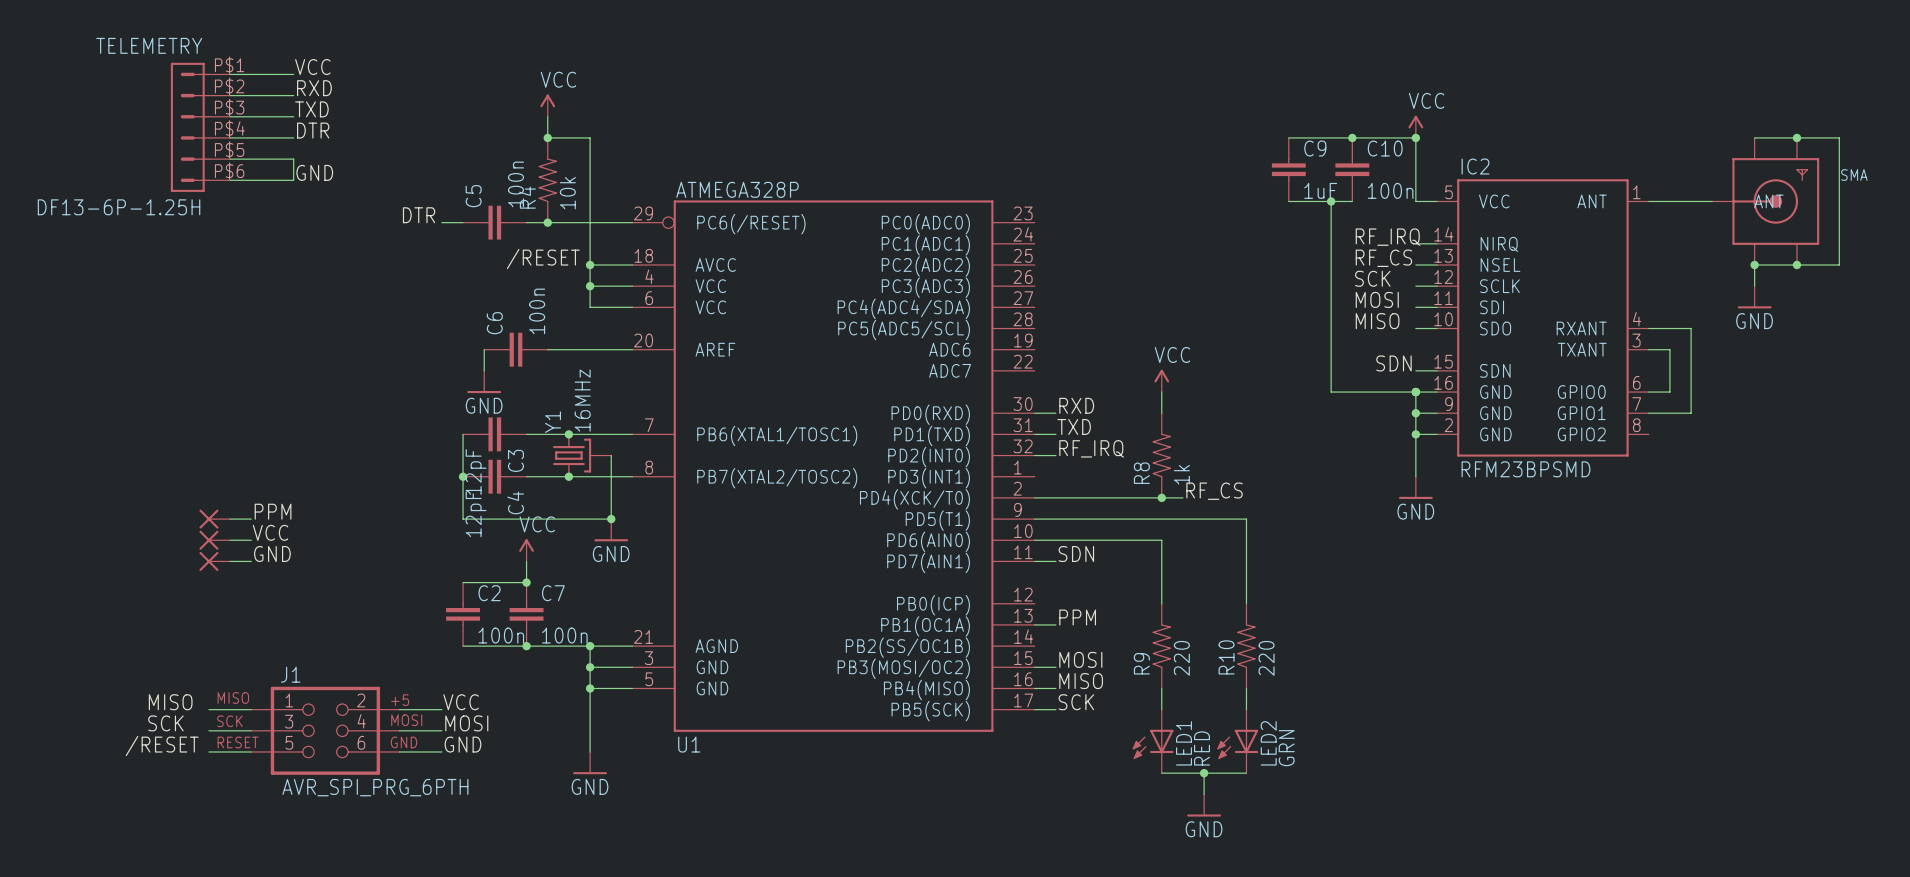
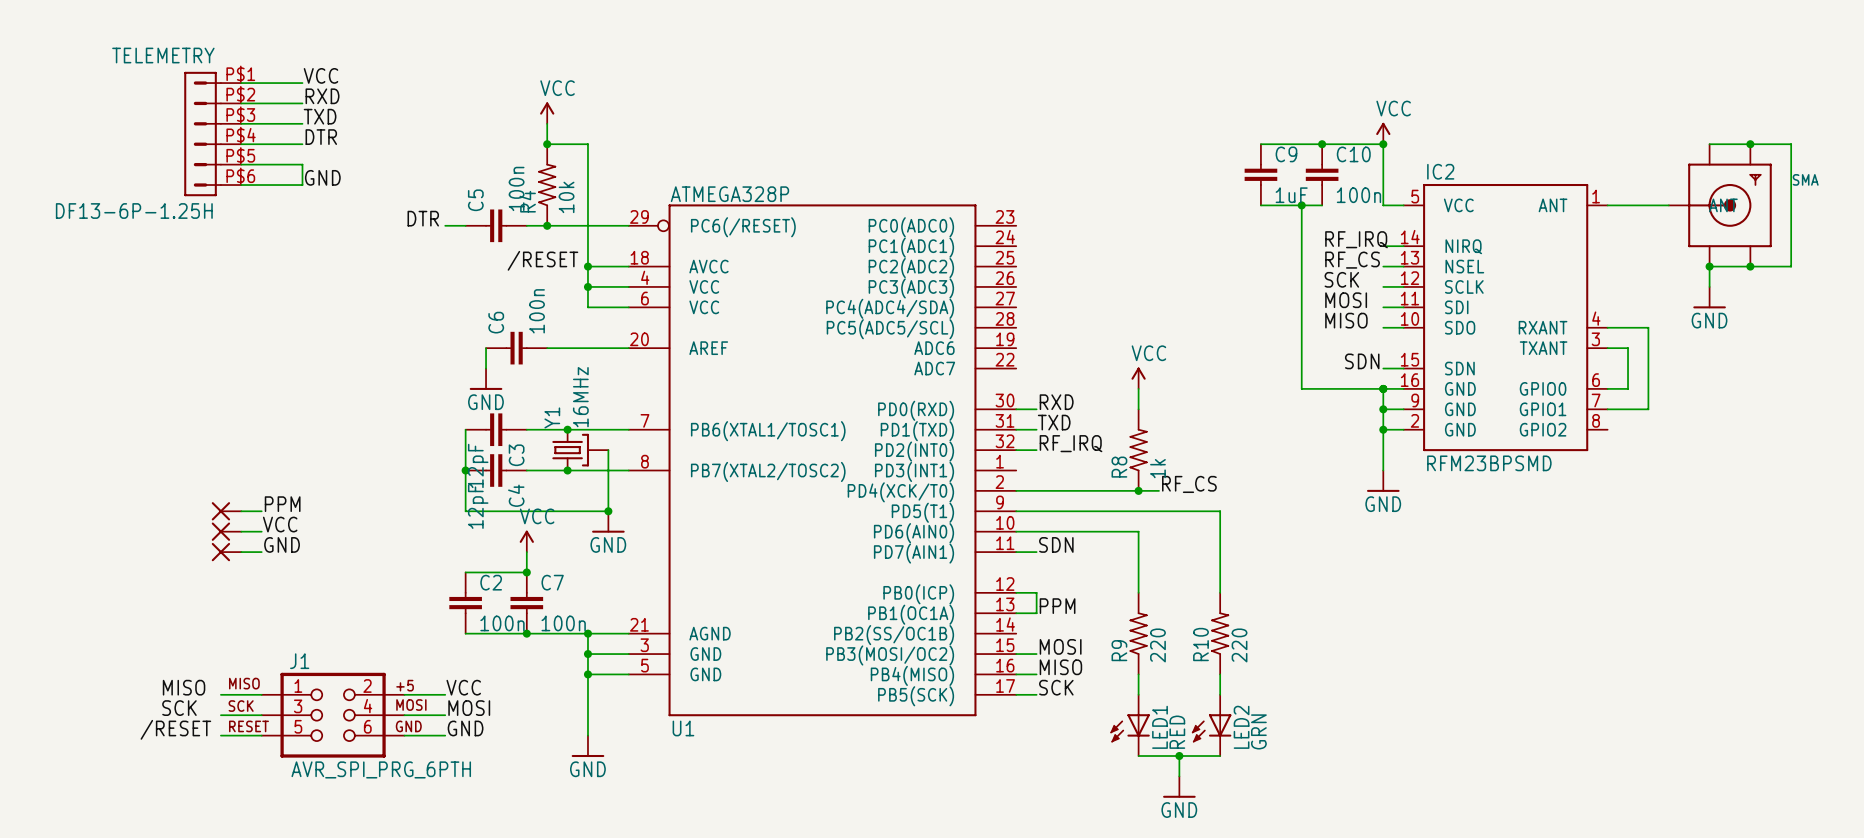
wire: none -> (1016, 592) (1036, 592) (1036, 613)

